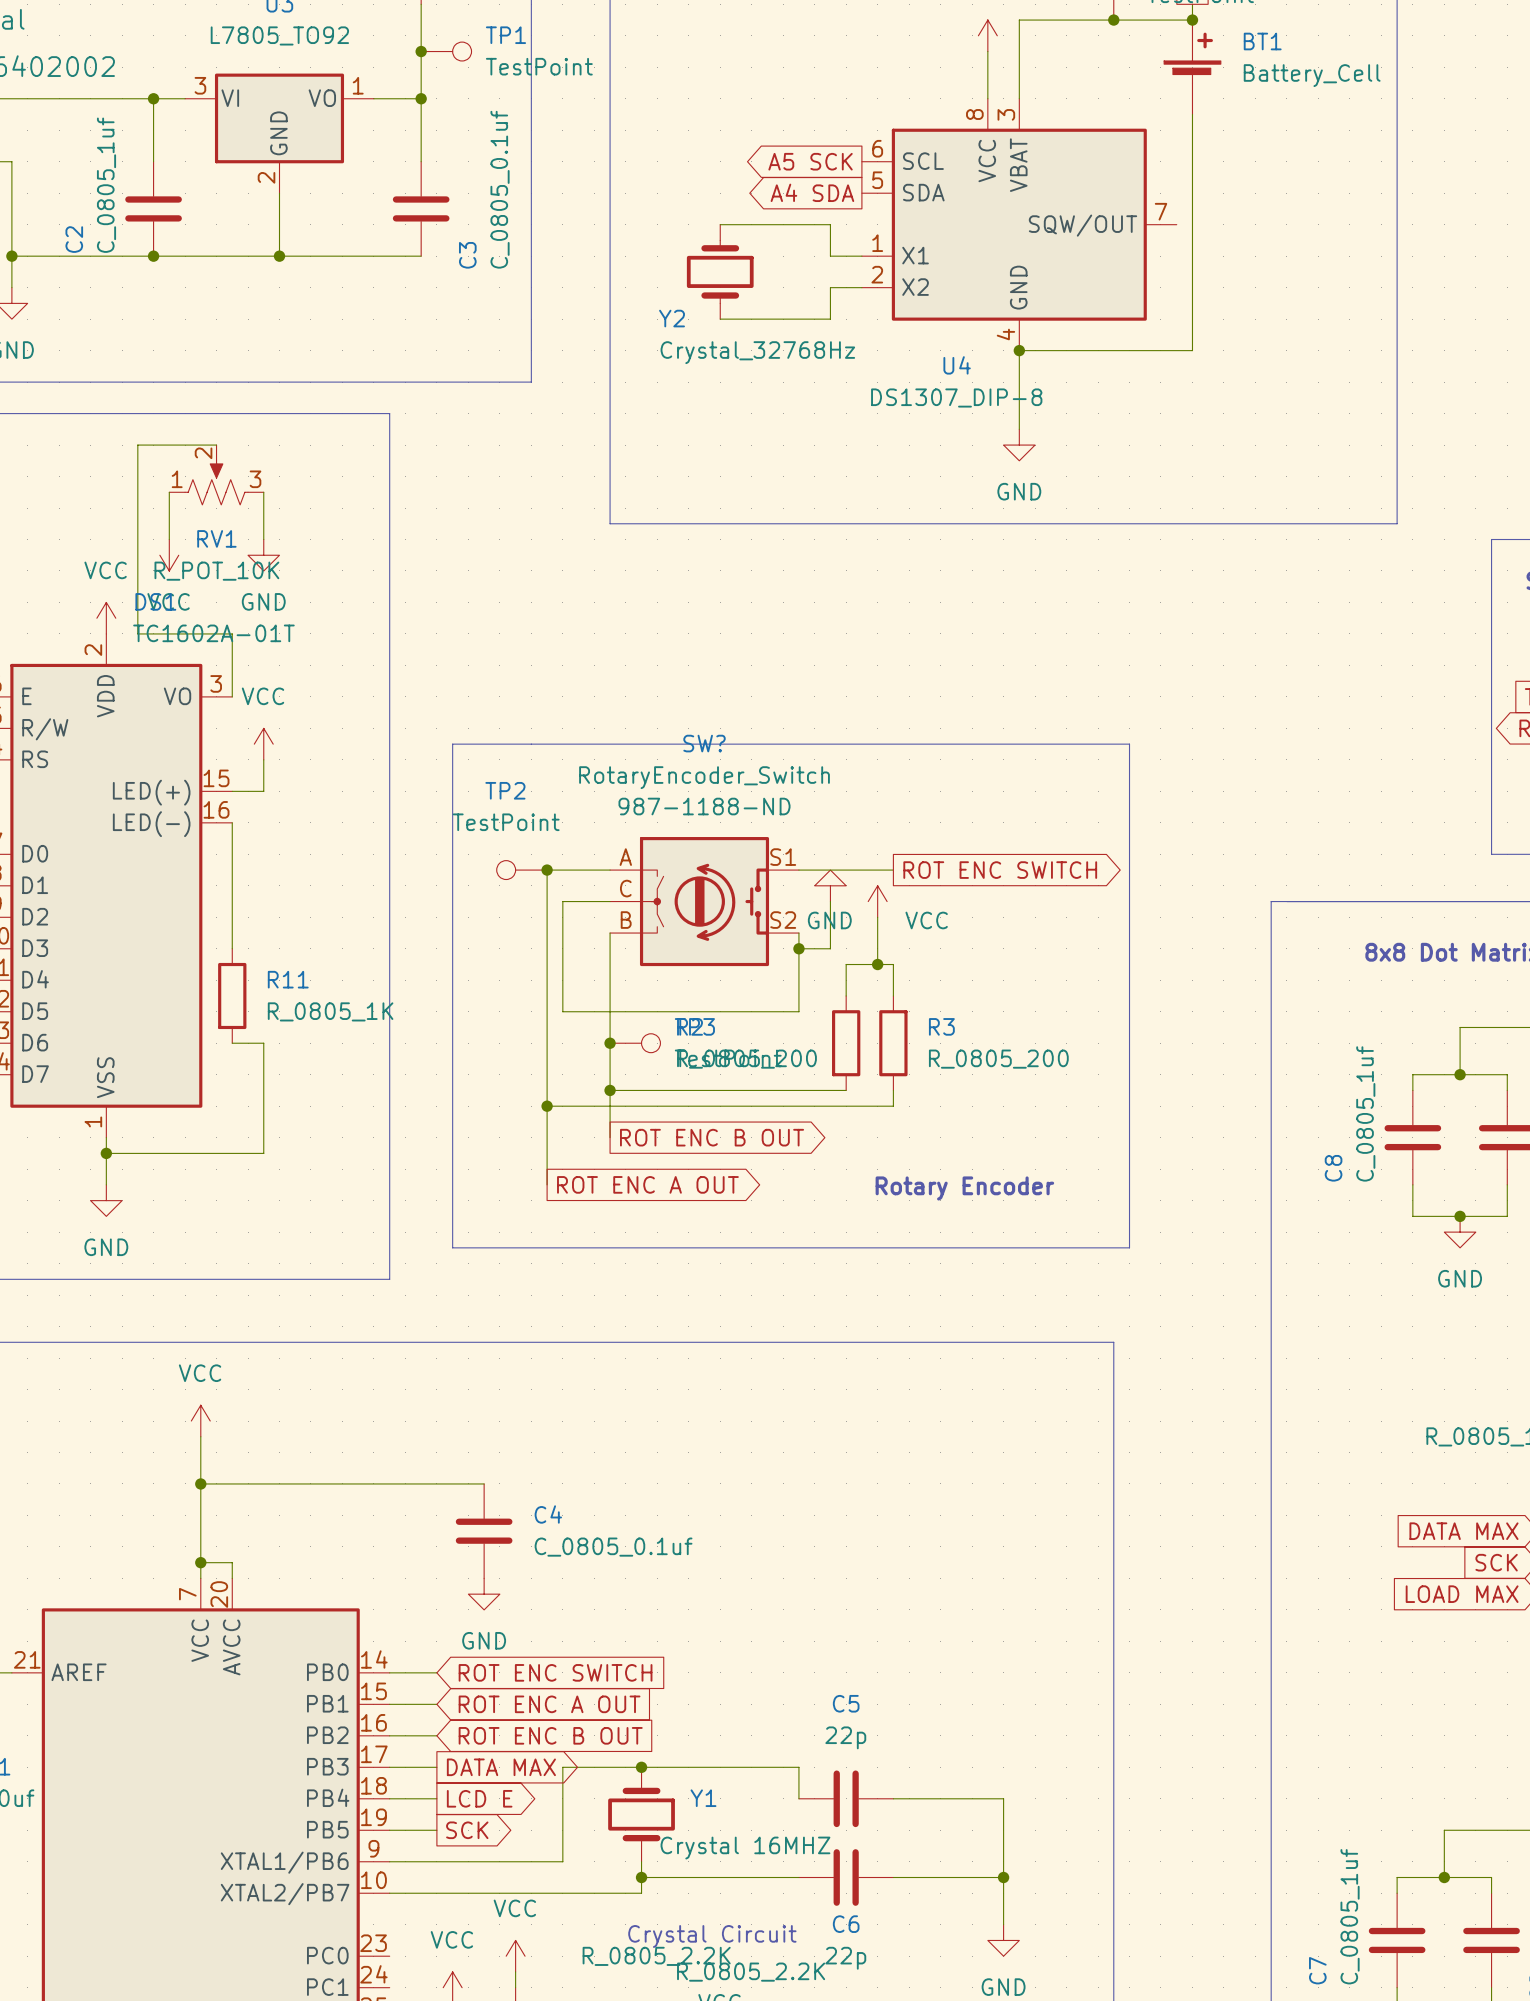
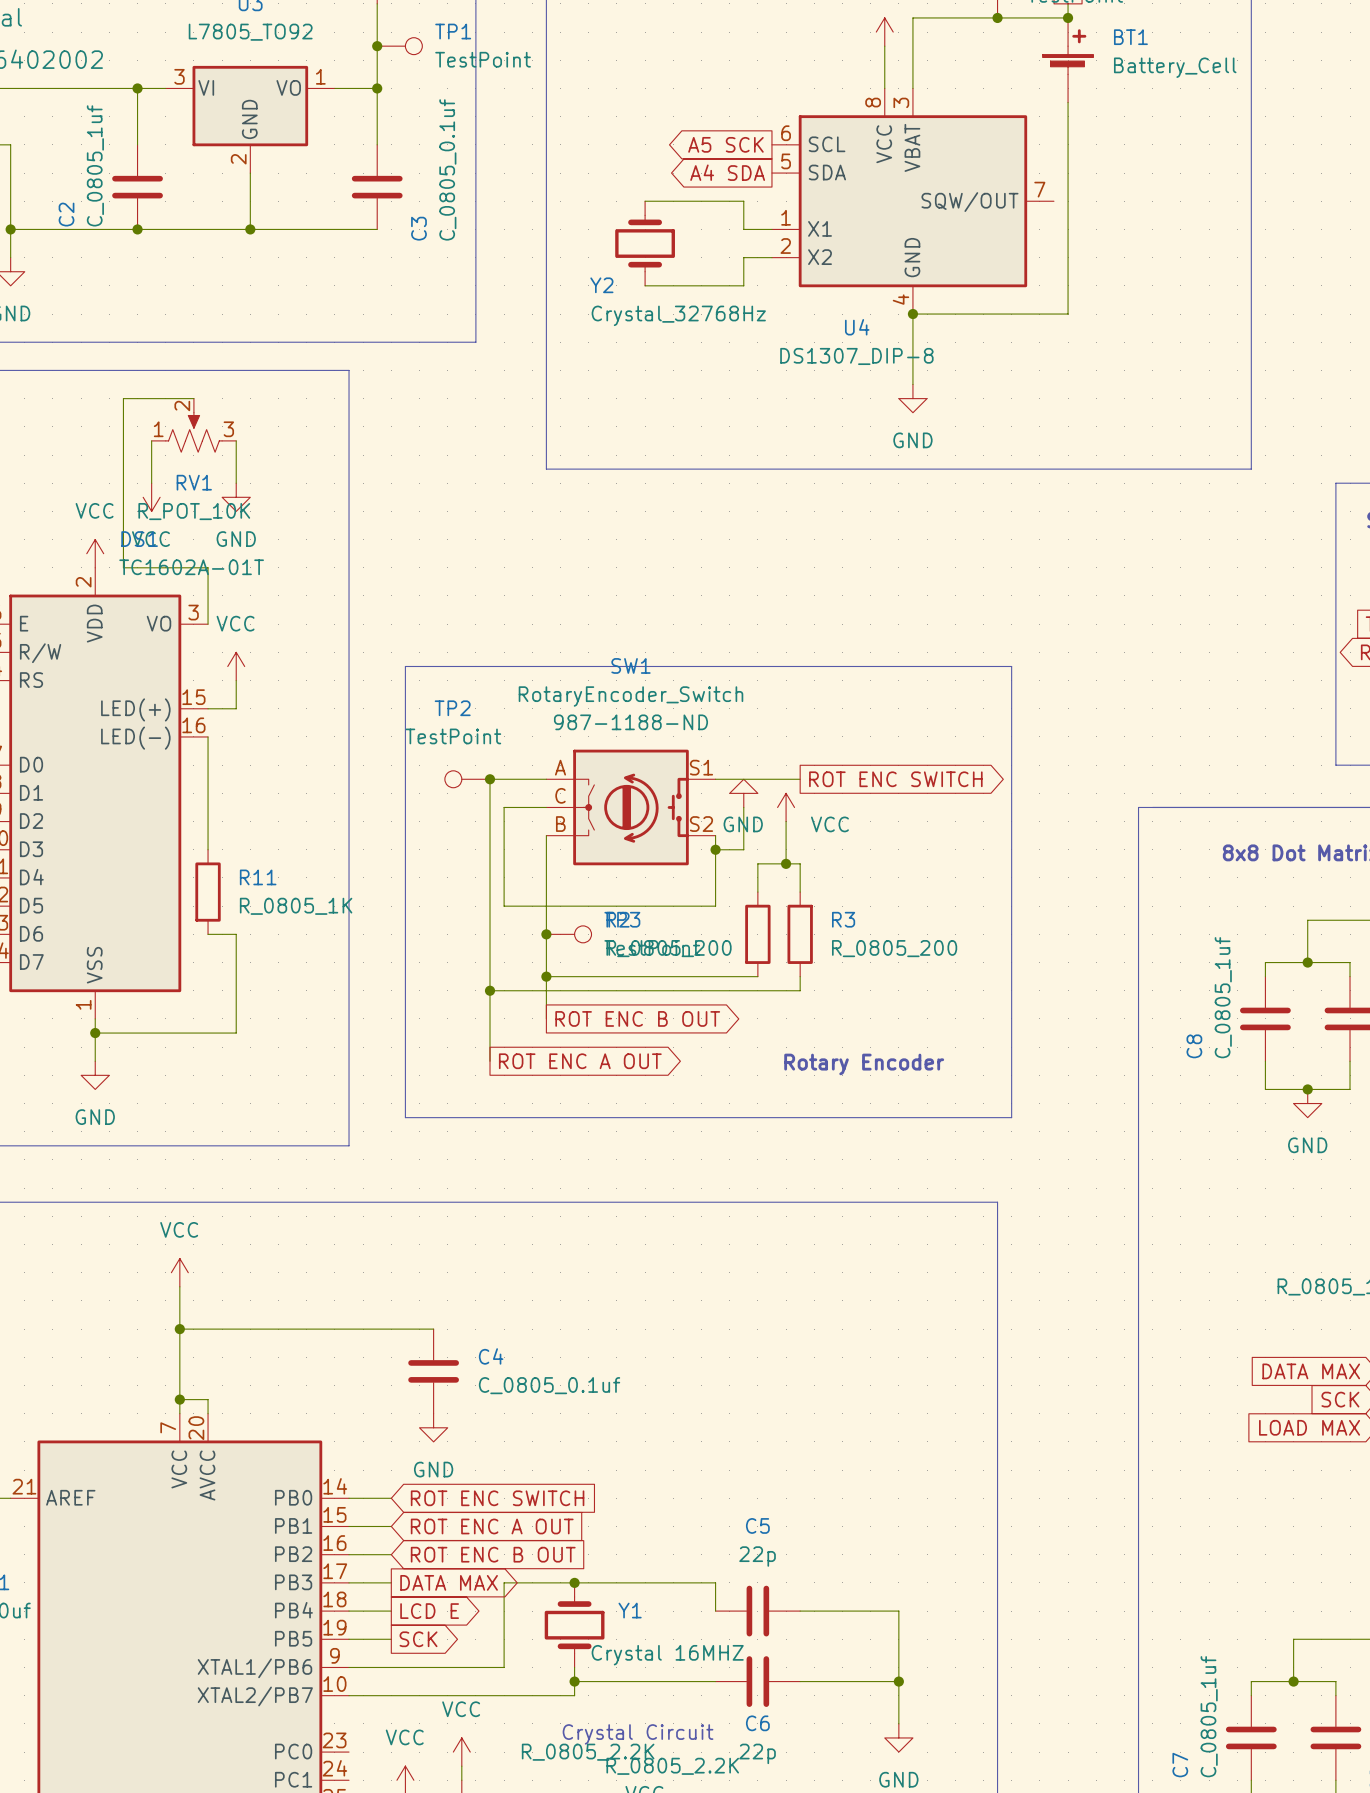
SW? name: SW? (704, 743) -> SW1 (630, 665)

